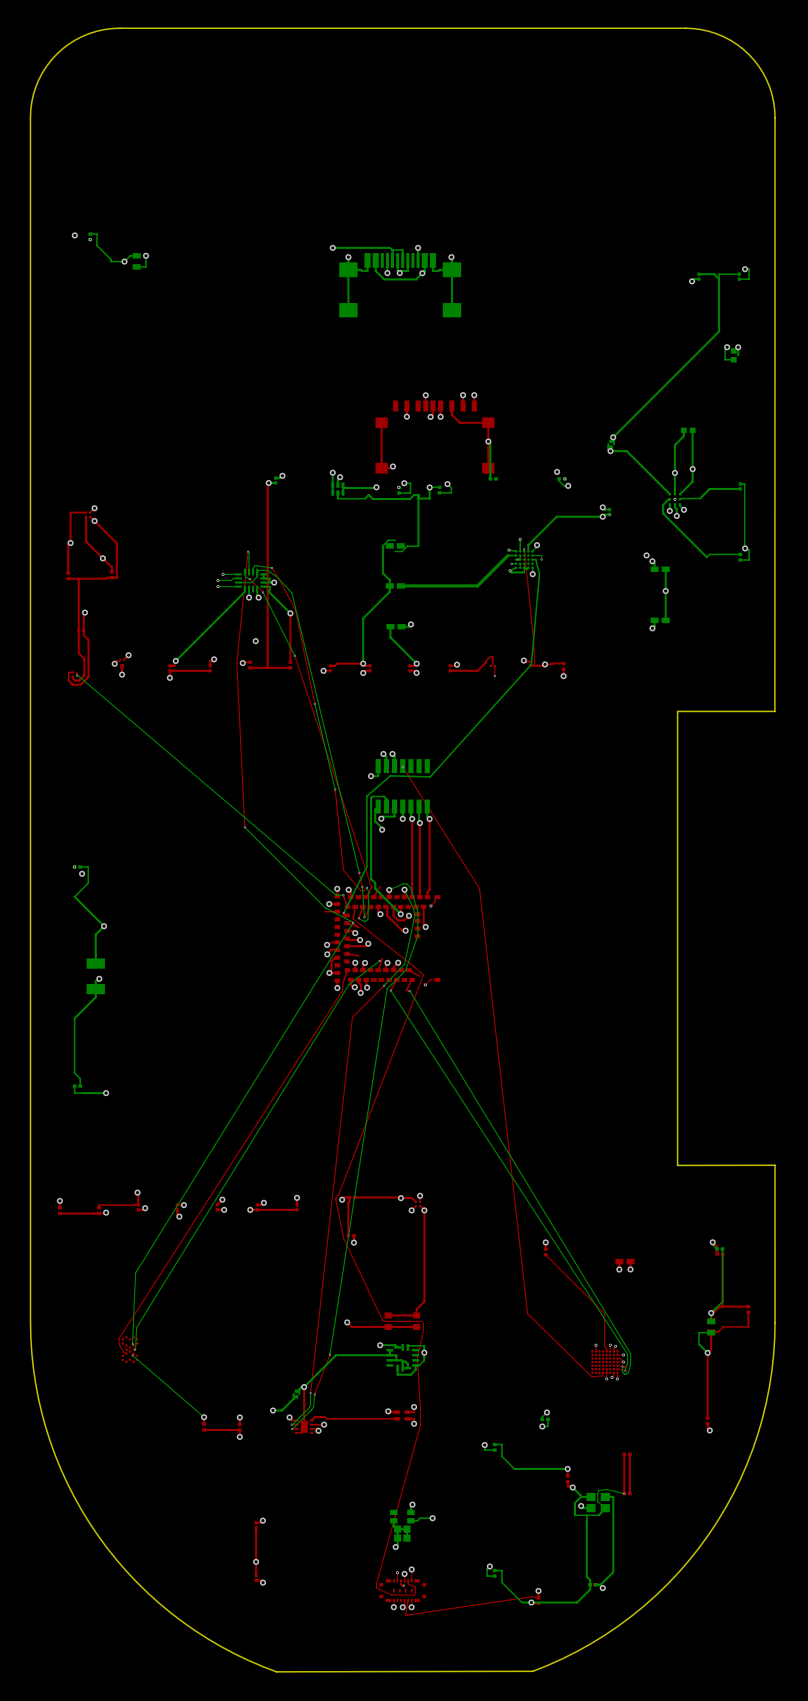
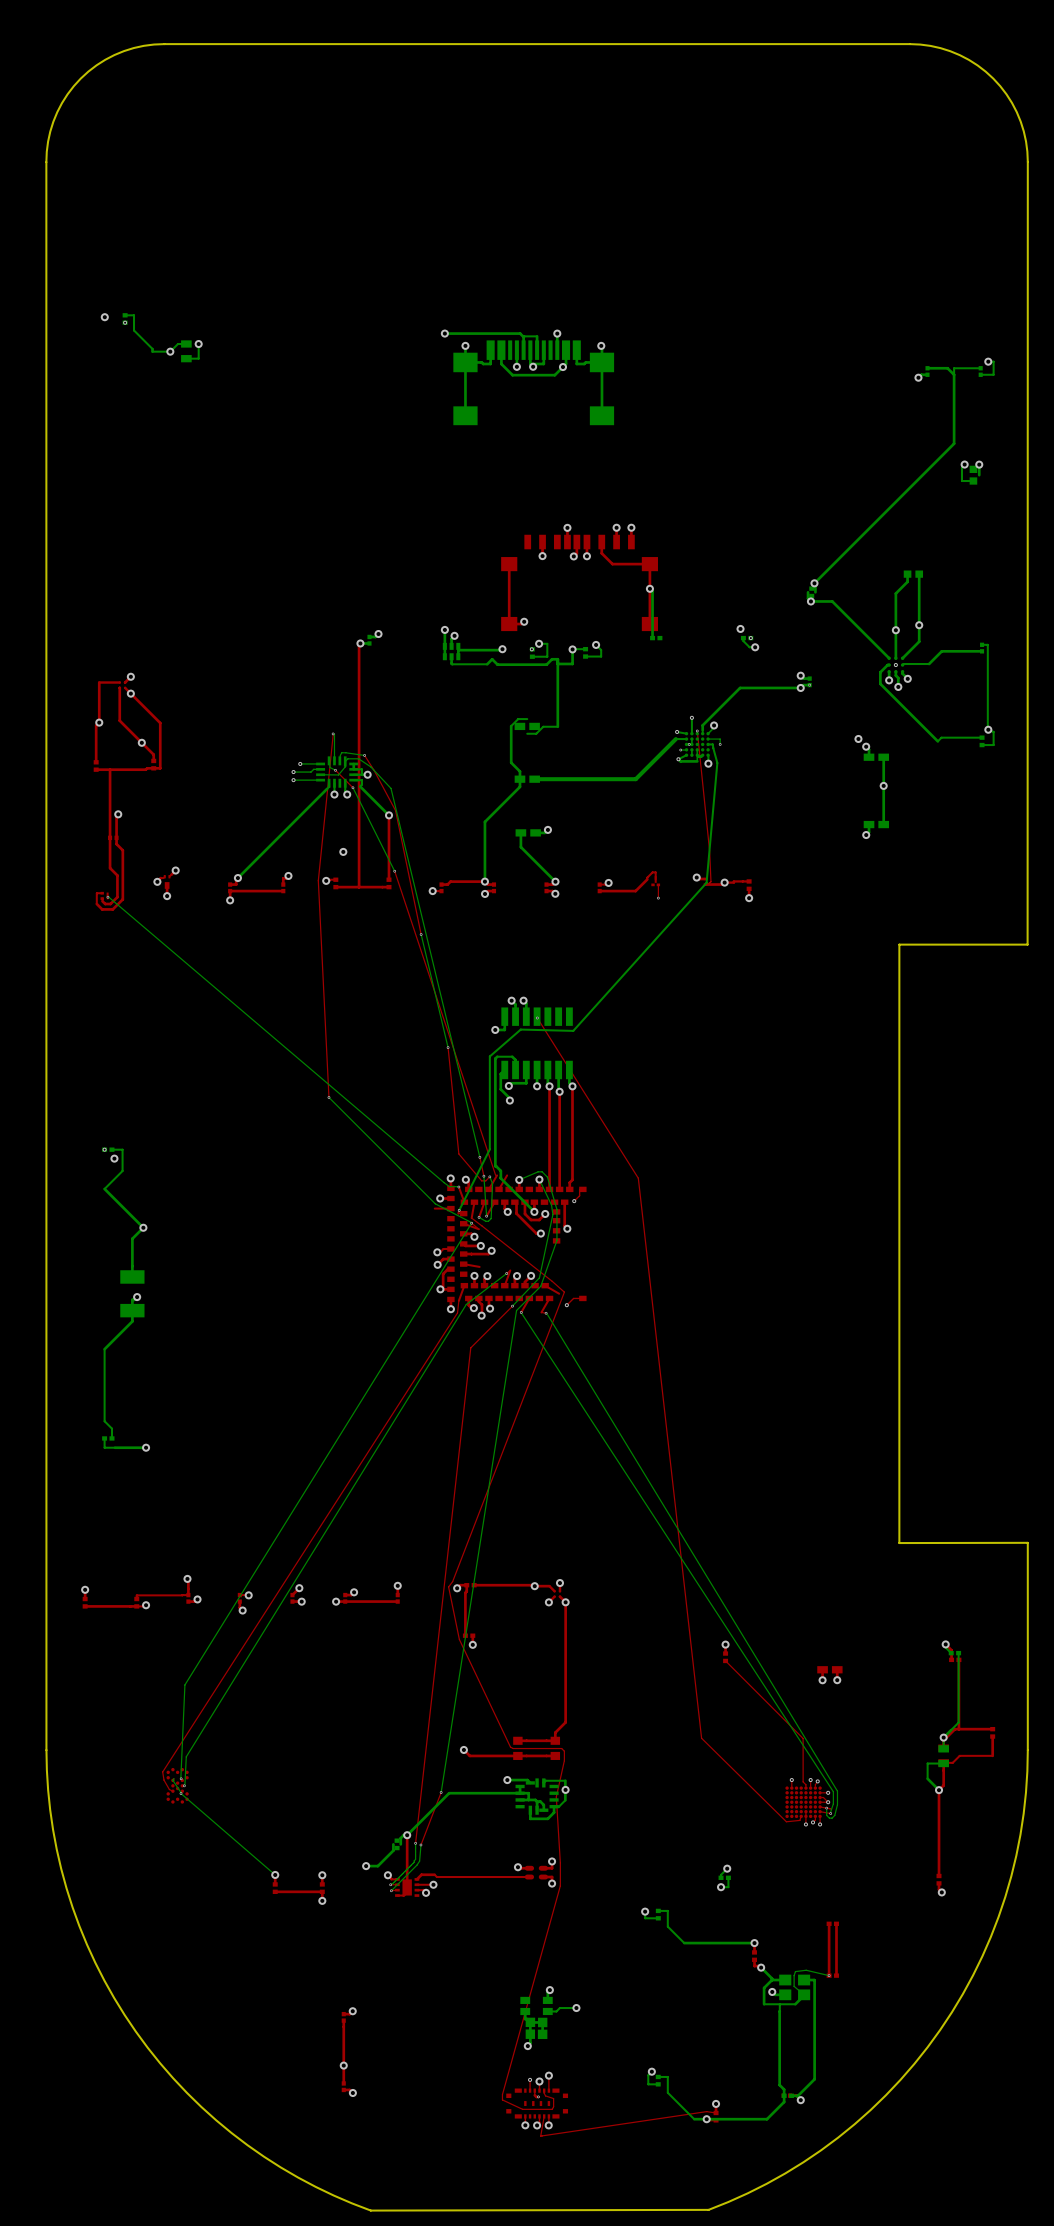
bottom track: none -> (173, 1778) (172, 1780) (180, 1793)

